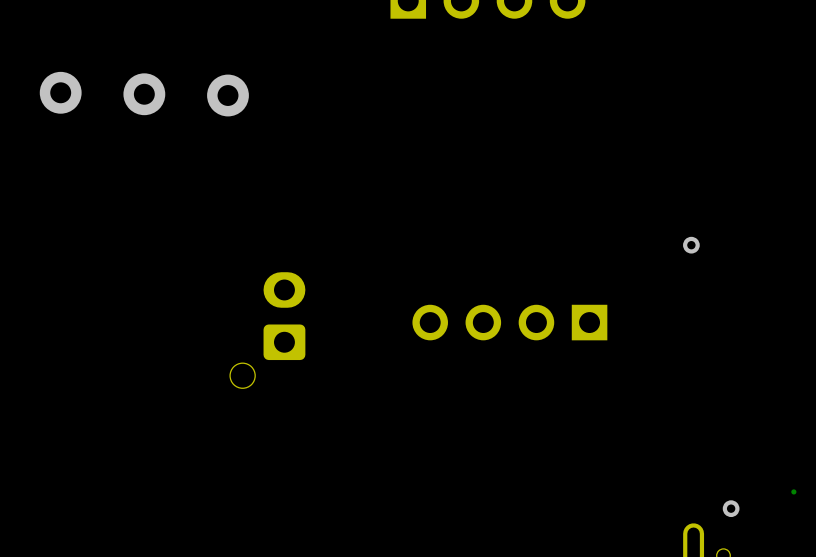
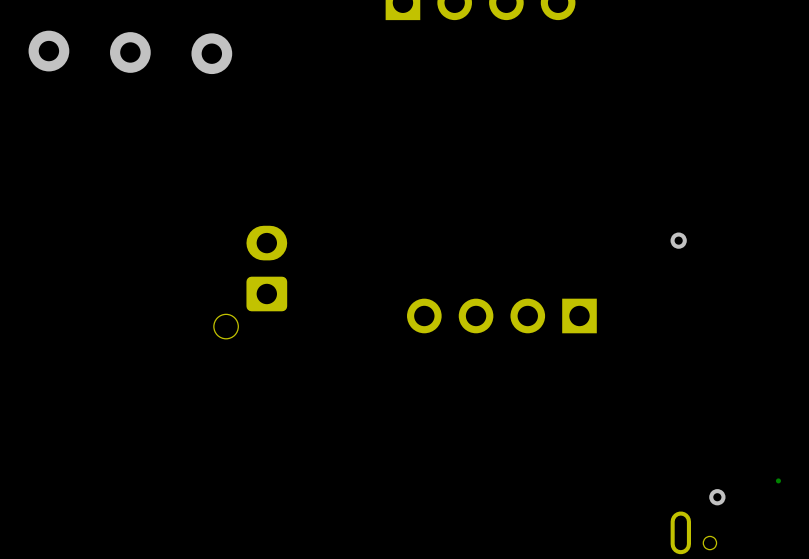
via: none -> (48, 51)
via: none -> (130, 52)
via: none -> (211, 53)
via: (60, 92) -> none
via: (144, 94) -> none
via: (227, 95) -> none
part position: (267, 330) -> (250, 282)

